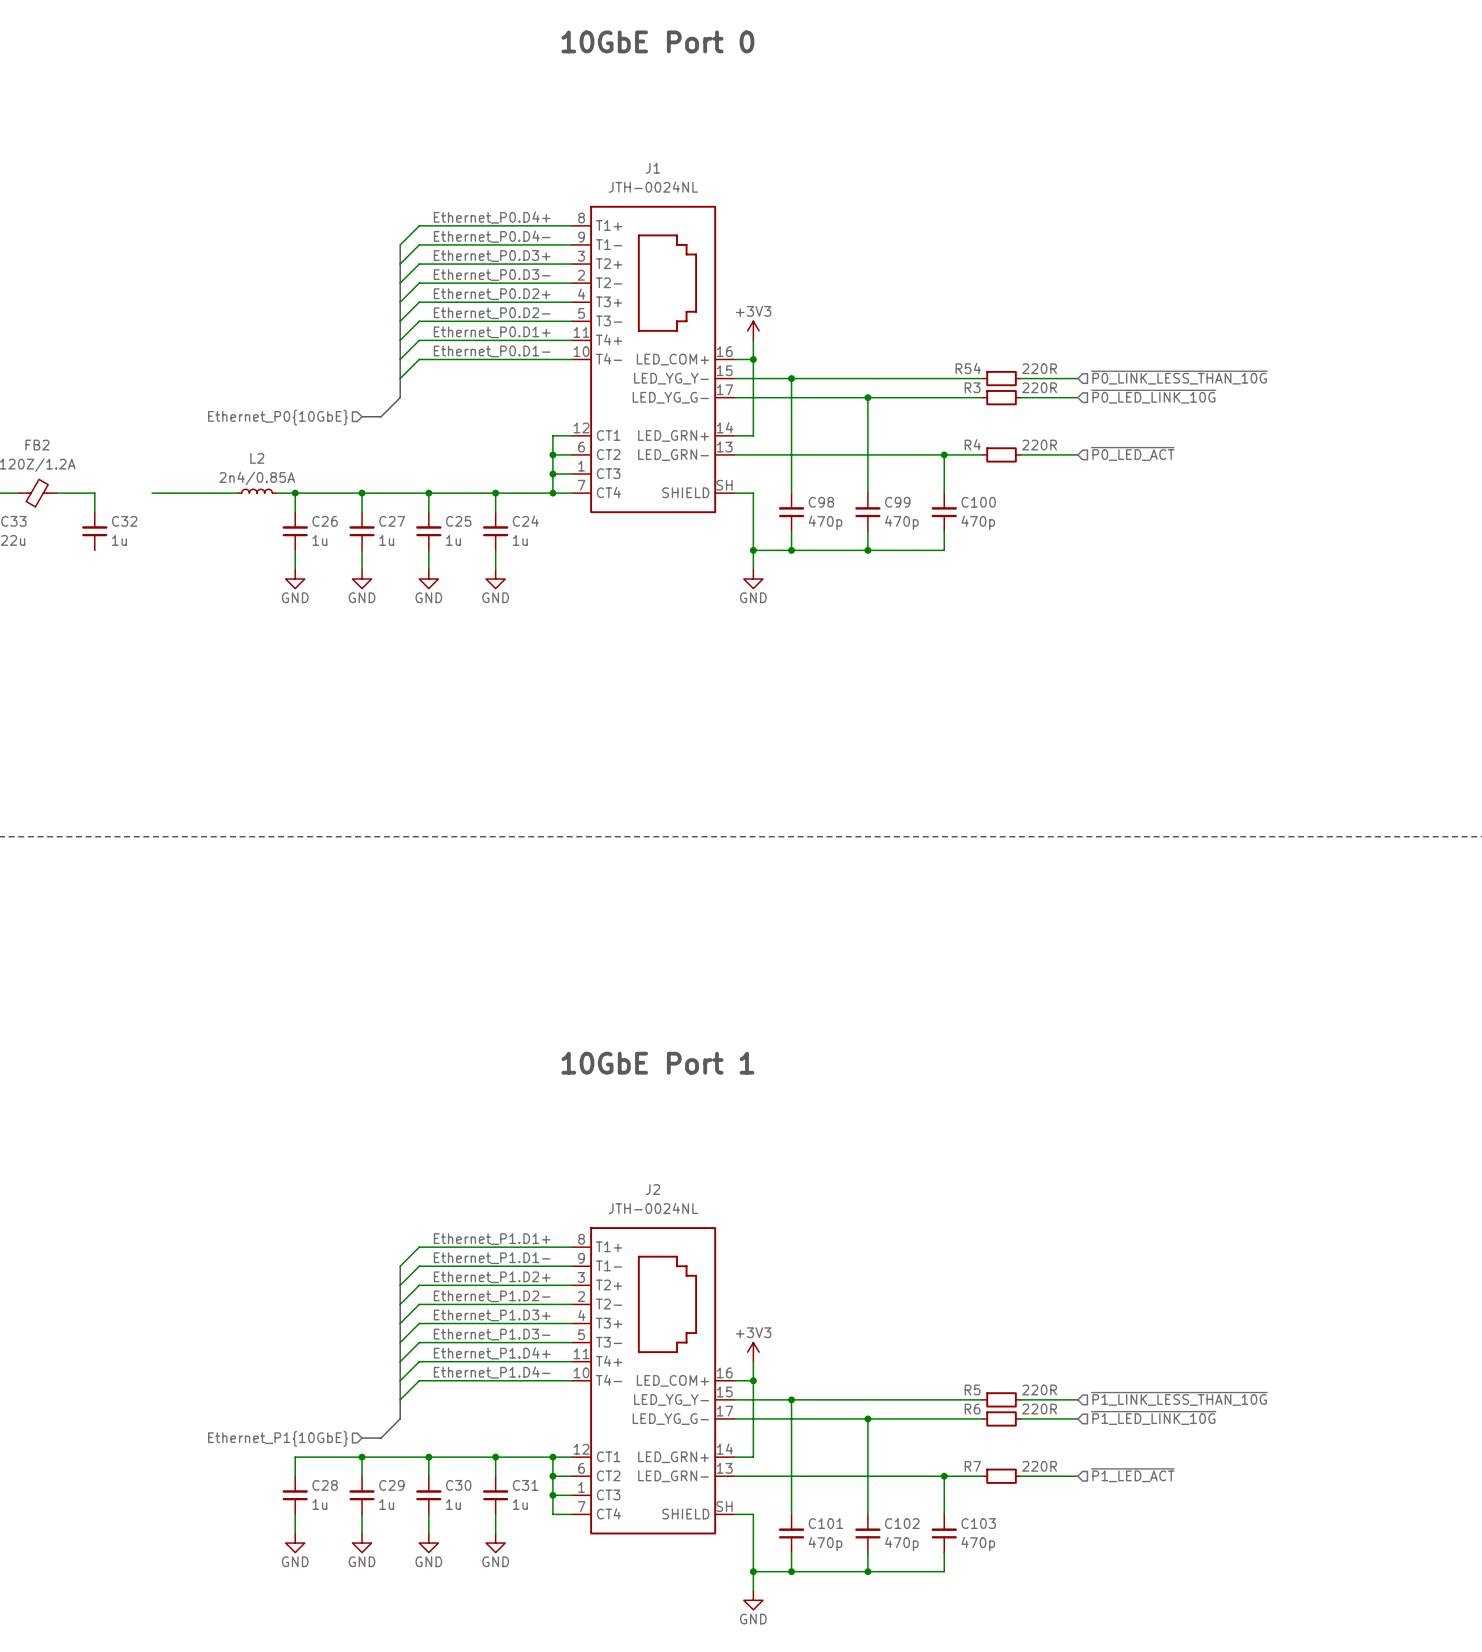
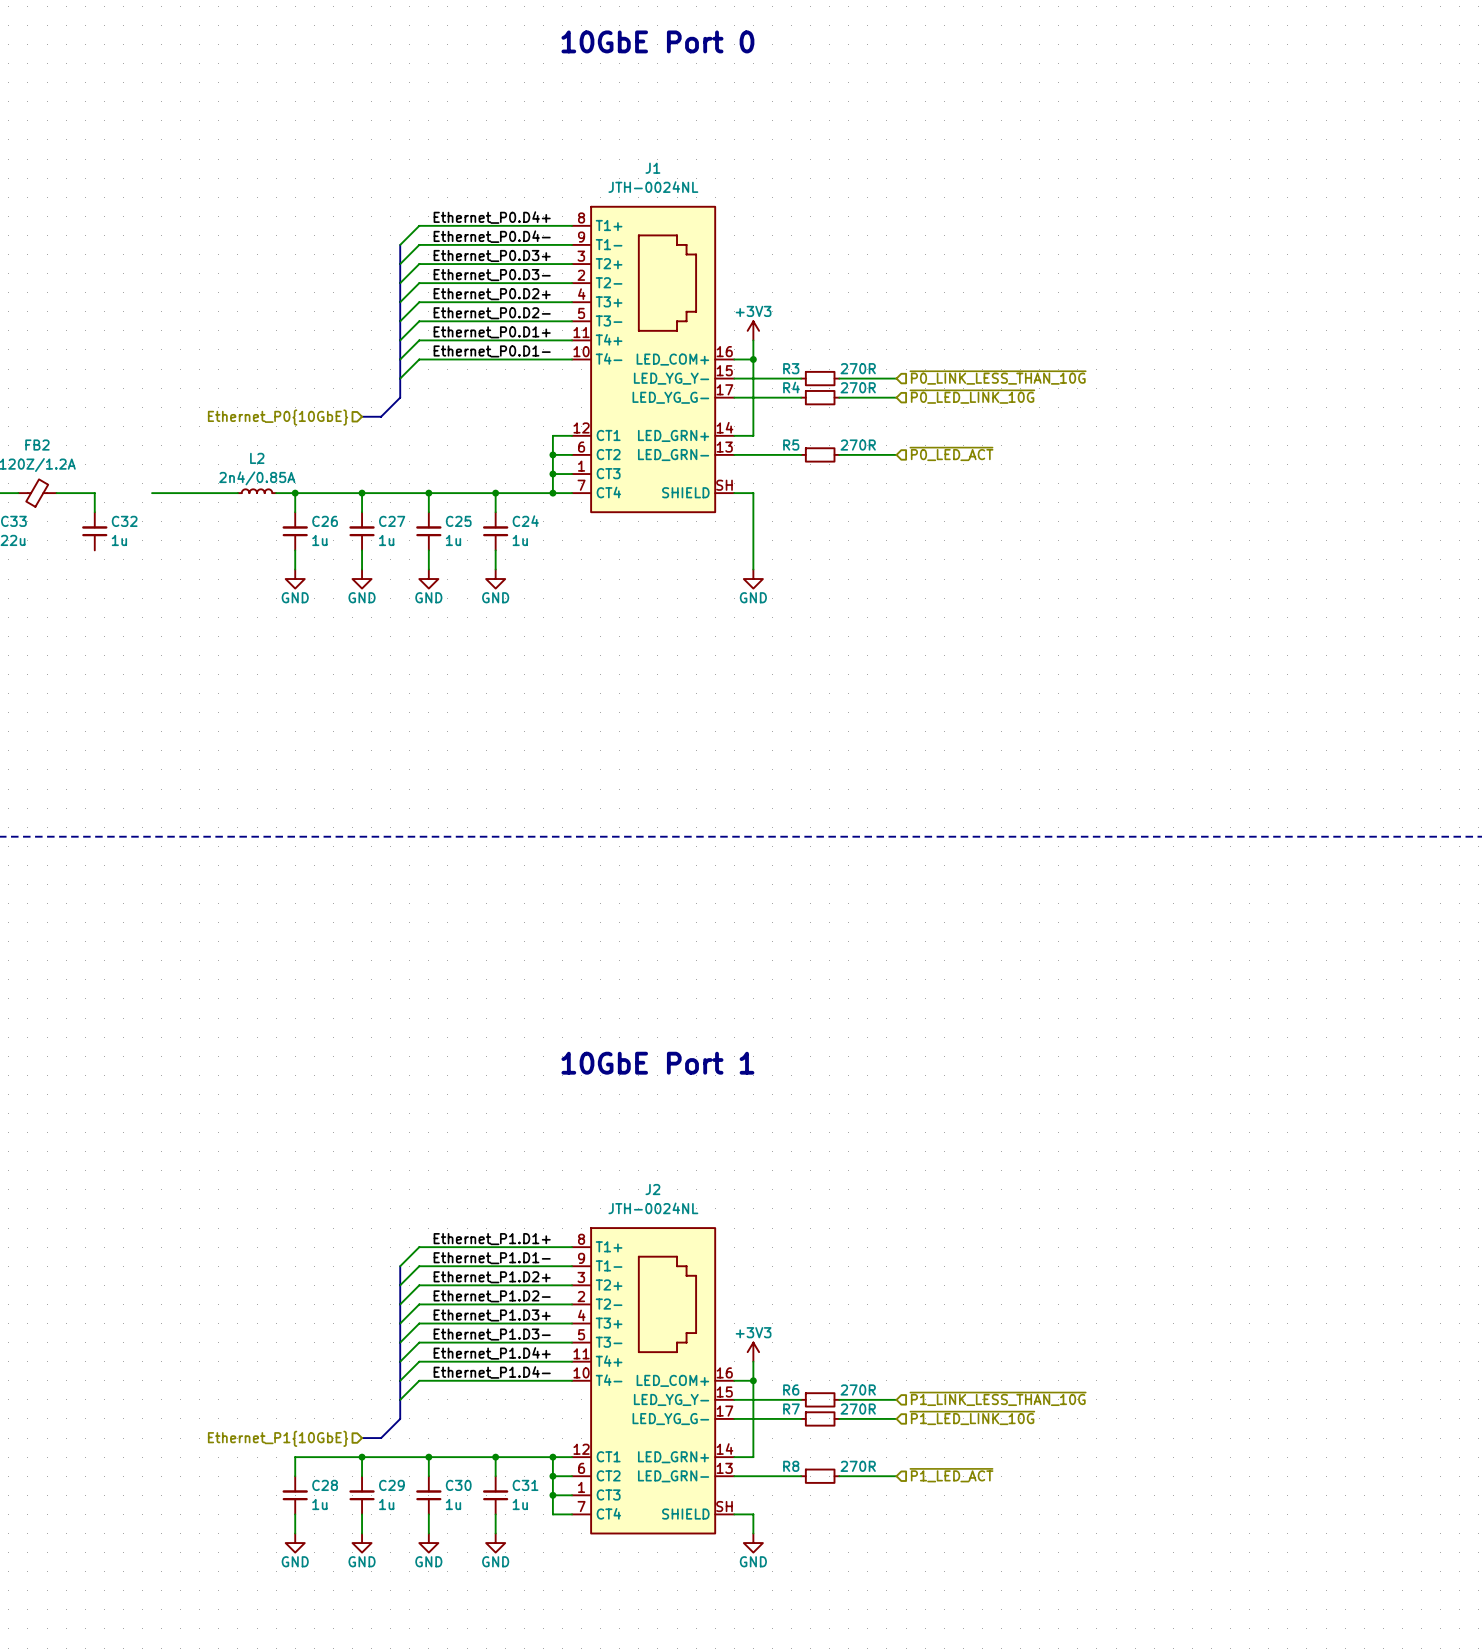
hierarchical label position: ~{P0_LINK_LESS_THAN_10G} (1179, 377) -> ~{P0_LINK_LESS_THAN_10G} (998, 377)
wire: (791, 378) (791, 493) -> none
junction: (791, 378) -> none
wire: (801, 378) (839, 378) -> none
wire: (896, 378) (982, 378) -> none
R54: (1001, 378) -> none
wire: (1020, 378) (1077, 378) -> none
R3 text: 220R (1039, 387) -> 270R (858, 368)
hierarchical label position: ~{P0_LED_LINK_10G} (1153, 396) -> ~{P0_LED_LINK_10G} (972, 396)
wire: (801, 397) (839, 397) -> none
wire: (867, 397) (867, 493) -> none
junction: (867, 397) -> none
wire: (896, 397) (982, 397) -> none
R3 position: (1001, 397) -> (820, 378)
wire: (1020, 397) (1077, 397) -> none
R4 text: 220R (1039, 445) -> 270R (858, 387)
hierarchical label position: ~{P0_LED_ACT} (1132, 453) -> ~{P0_LED_ACT} (951, 453)
wire: (801, 454) (839, 454) -> none
wire: (896, 454) (982, 454) -> none
wire: (944, 454) (944, 493) -> none
junction: (944, 454) -> none
R4 position: (1001, 454) -> (820, 397)
wire: (1020, 454) (1077, 454) -> none
C98: (791, 512) -> none
C99: (867, 512) -> none
C100: (944, 512) -> none
wire: (791, 531) (791, 550) -> none
wire: (867, 531) (867, 550) -> none
wire: (944, 531) (944, 550) (753, 550) -> none
junction: (753, 550) -> none
junction: (791, 550) -> none
junction: (867, 550) -> none
R5 text: 220R (1039, 1389) -> 270R (858, 445)
hierarchical label position: ~{P1_LINK_LESS_THAN_10G} (1179, 1398) -> ~{P1_LINK_LESS_THAN_10G} (998, 1398)
wire: (791, 1399) (791, 1514) -> none
junction: (791, 1399) -> none
wire: (801, 1399) (839, 1399) -> none
wire: (896, 1399) (982, 1399) -> none
R5 position: (1001, 1399) -> (820, 454)
wire: (1020, 1399) (1077, 1399) -> none
R6 text: 220R (1039, 1409) -> 270R (858, 1389)
hierarchical label position: ~{P1_LED_LINK_10G} (1153, 1417) -> ~{P1_LED_LINK_10G} (972, 1417)
wire: (801, 1418) (839, 1418) -> none
wire: (867, 1418) (867, 1514) -> none
junction: (867, 1418) -> none
wire: (896, 1418) (982, 1418) -> none
R6 position: (1001, 1418) -> (820, 1399)
wire: (1020, 1418) (1077, 1418) -> none
R7 text: 220R (1039, 1466) -> 270R (858, 1409)
hierarchical label position: ~{P1_LED_ACT} (1132, 1475) -> ~{P1_LED_ACT} (951, 1475)
wire: (801, 1476) (839, 1476) -> none
R8: none -> (820, 1476)
wire: (896, 1476) (982, 1476) -> none
wire: (944, 1476) (944, 1514) -> none
junction: (944, 1476) -> none
R7 position: (1001, 1476) -> (820, 1418)
wire: (1020, 1476) (1077, 1476) -> none
wire: (753, 1533) (753, 1590) -> none
C101: (791, 1533) -> none
C102: (867, 1533) -> none
C103: (944, 1533) -> none
wire: (791, 1552) (791, 1571) -> none
wire: (867, 1552) (867, 1571) -> none
wire: (944, 1552) (944, 1571) (753, 1571) -> none
junction: (753, 1571) -> none
junction: (791, 1571) -> none
junction: (867, 1571) -> none
power symbol position: GND (753, 1600) -> GND (753, 1543)

